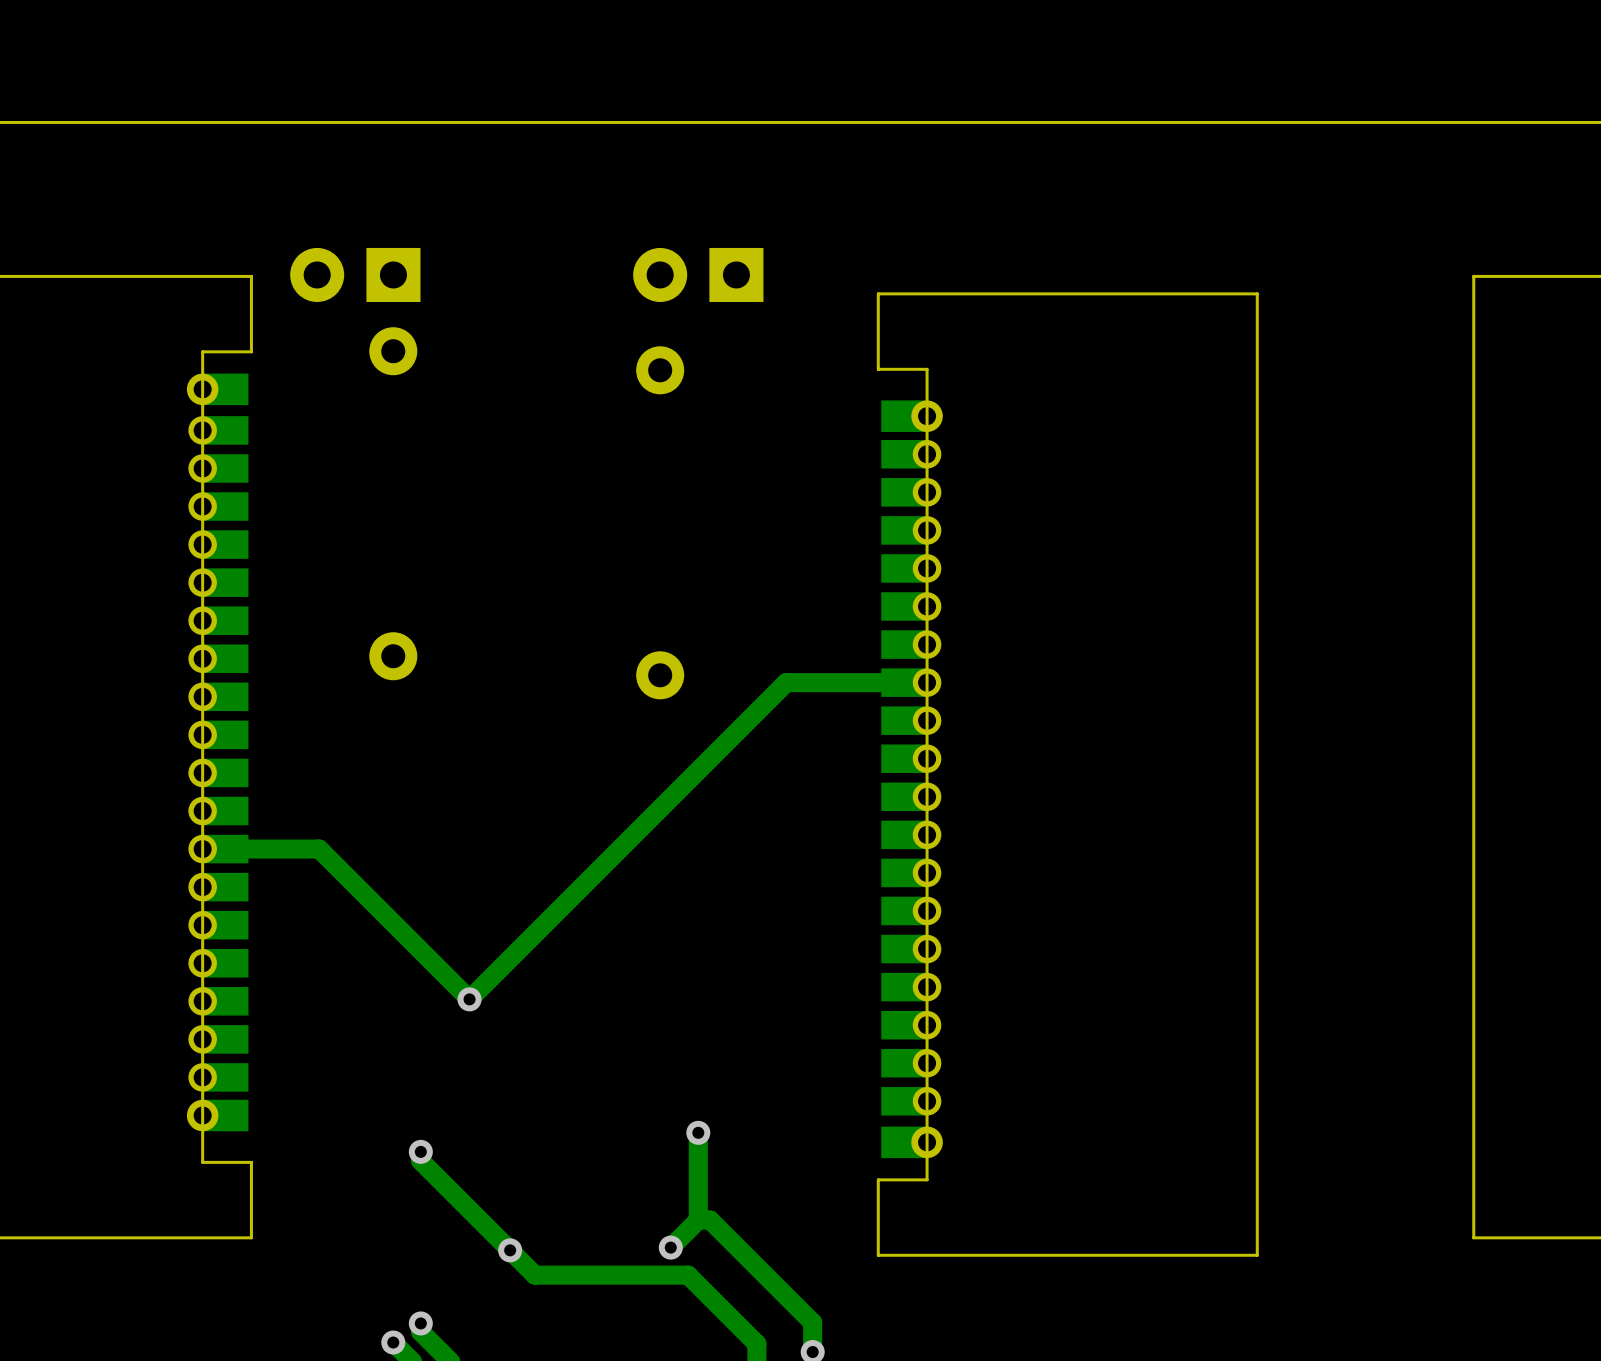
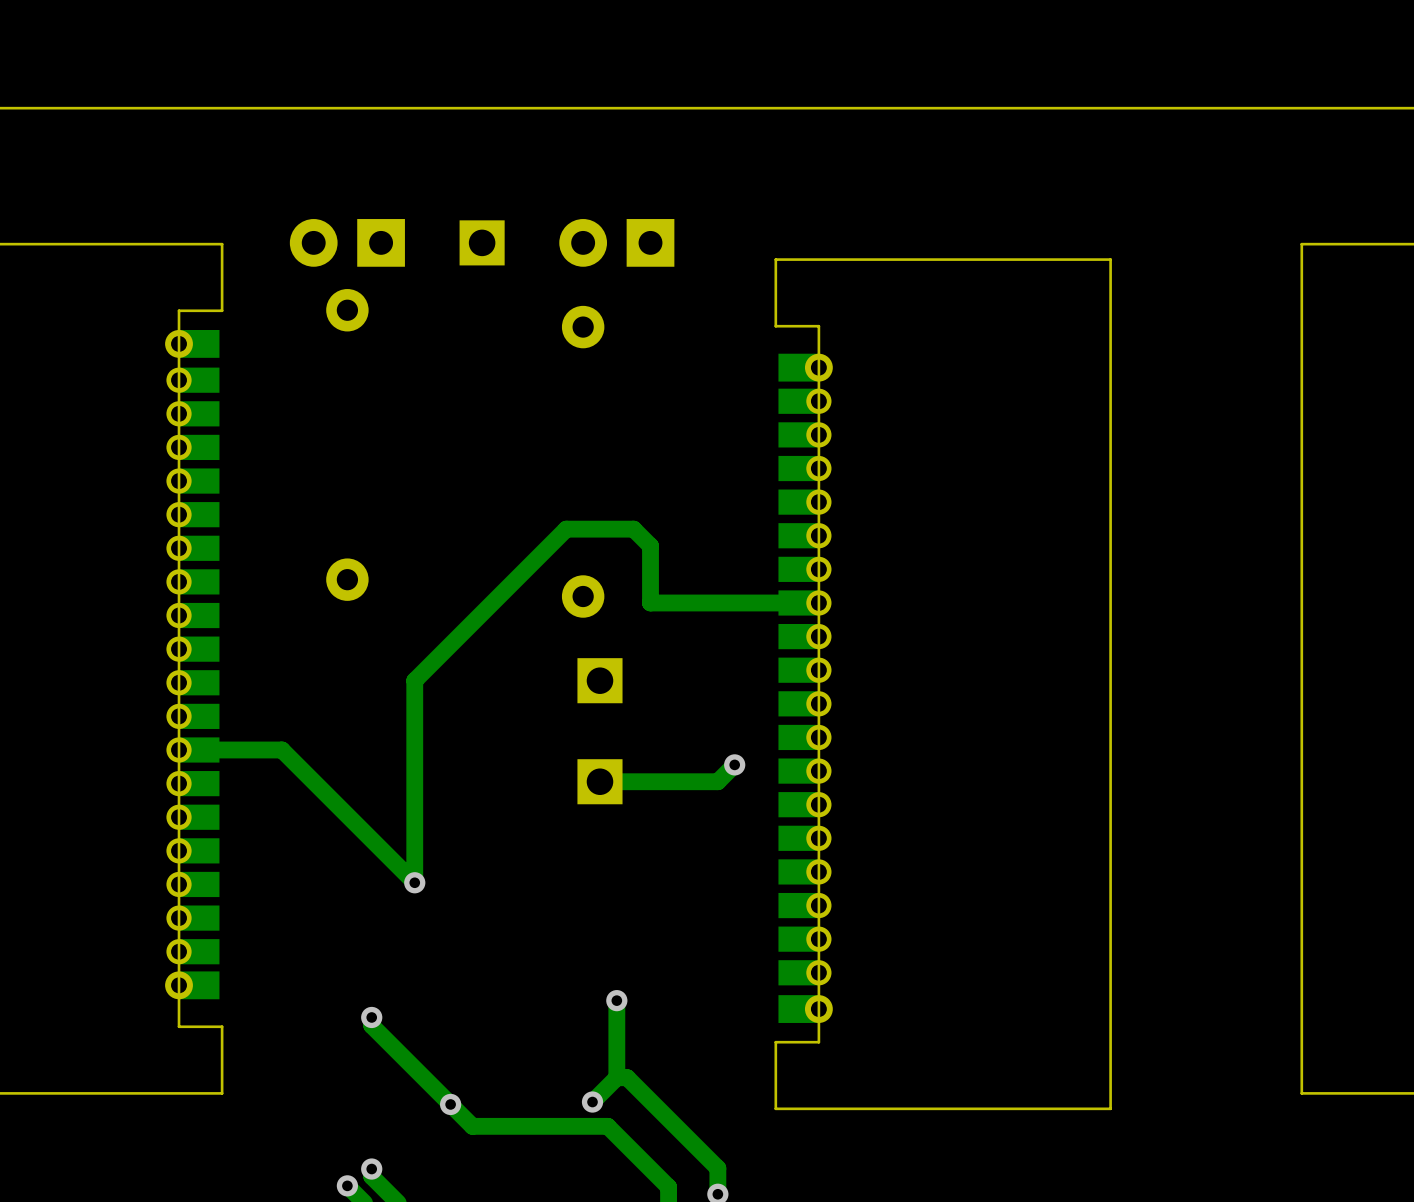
part position: (355, 274) -> (347, 242)
part: none -> (482, 242)
track: (786, 682) (469, 999) -> (694, 602) (650, 602) (650, 545) (633, 529) (566, 529) (414, 680) (414, 882)
part: none -> (599, 680)
track: none -> (734, 764) (717, 781) (599, 781)
via: none -> (734, 764)
part: none -> (599, 781)

